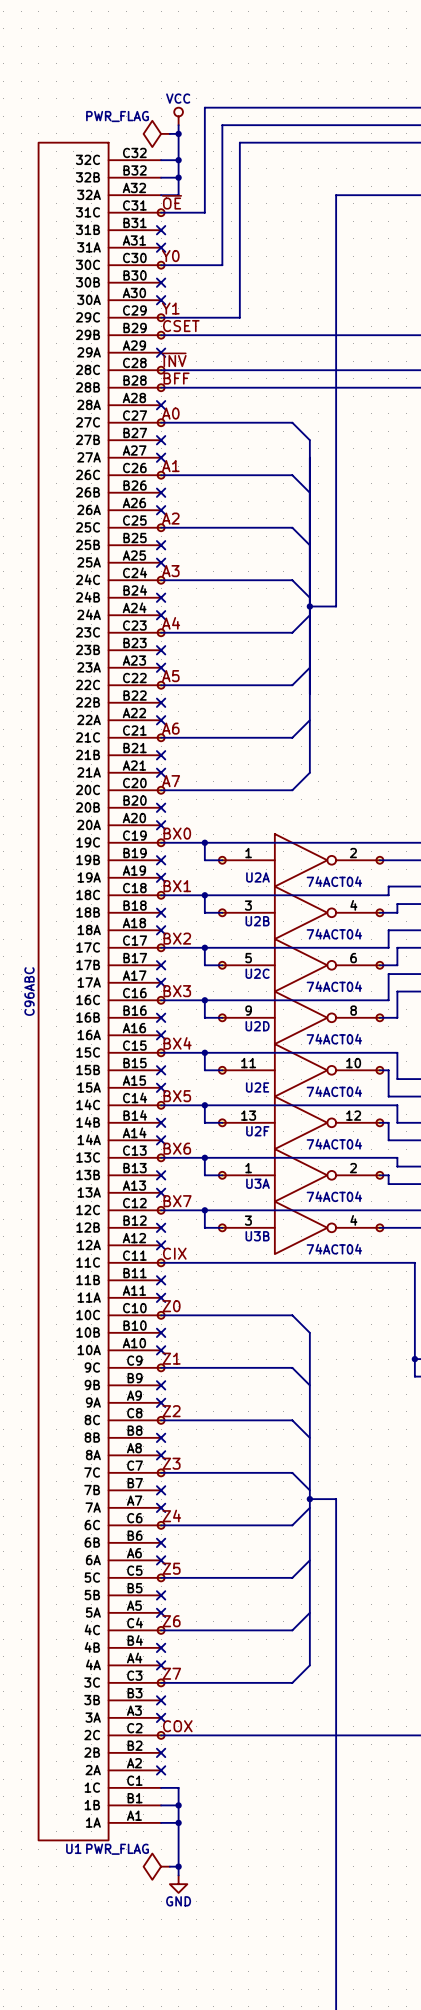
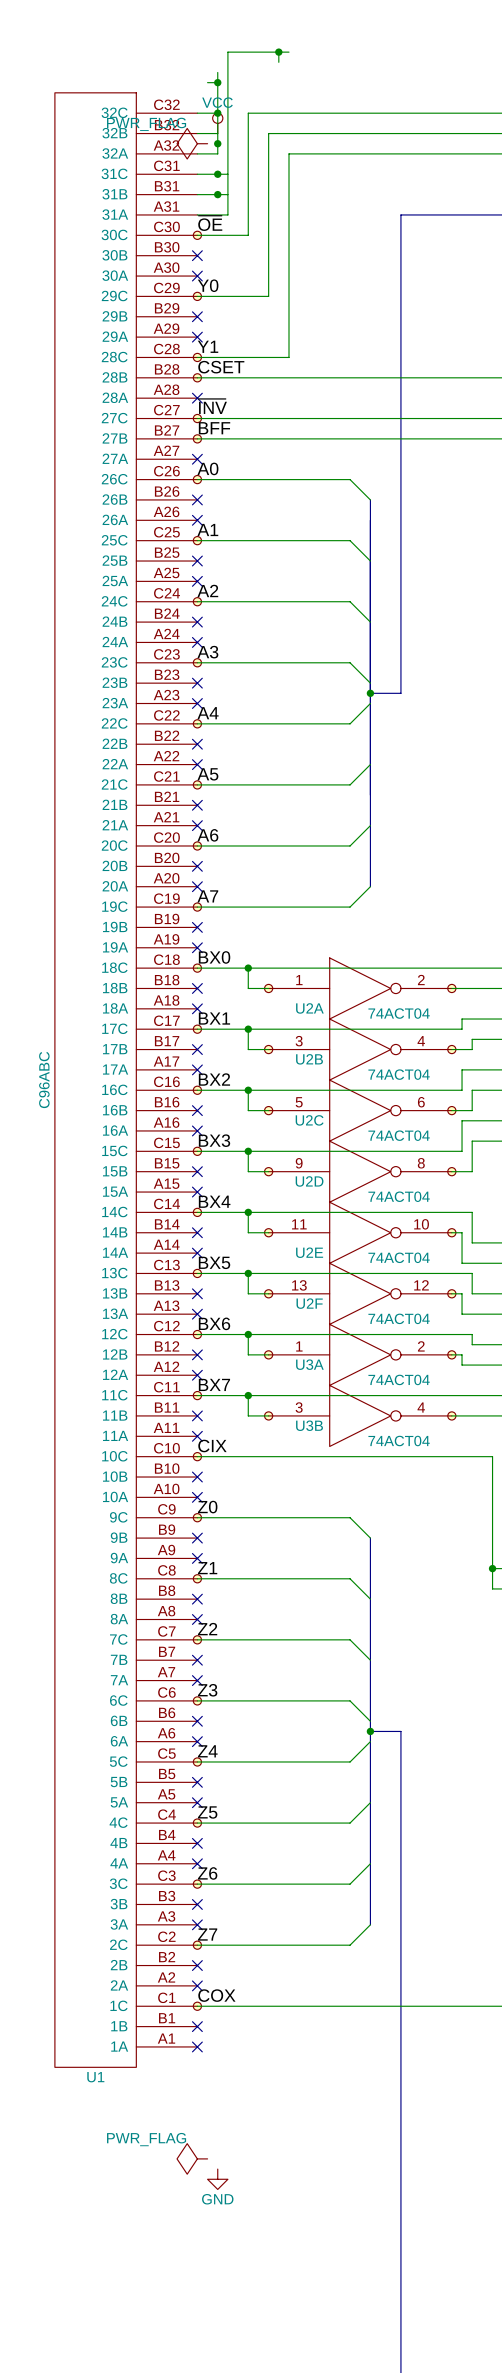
wire: none -> (278, 52) (278, 62)
junction: none -> (278, 52)
wire: none -> (288, 52) (227, 52) (227, 214) (217, 214)
wire: none -> (217, 72) (217, 133) (197, 133)
wire: none -> (207, 82) (217, 82)
junction: none -> (217, 82)
wire: none -> (197, 113) (217, 113)
junction: none -> (217, 113)
wire: (169, 133) (178, 133) -> (217, 174) (227, 174)
wire: (178, 142) (178, 195) -> (217, 153) (197, 153)
wire: none -> (217, 194) (227, 194)
U1 position: (99, 991) -> (126, 1080)
wire: (161, 1787) (178, 1787) (178, 1875) -> none
wire: (161, 1805) (178, 1805) -> none
junction: (178, 1805) -> none
wire: (161, 1822) (178, 1822) -> none
junction: (178, 1822) -> none
wire: (169, 1866) (178, 1866) -> none
junction: (178, 1866) -> none

